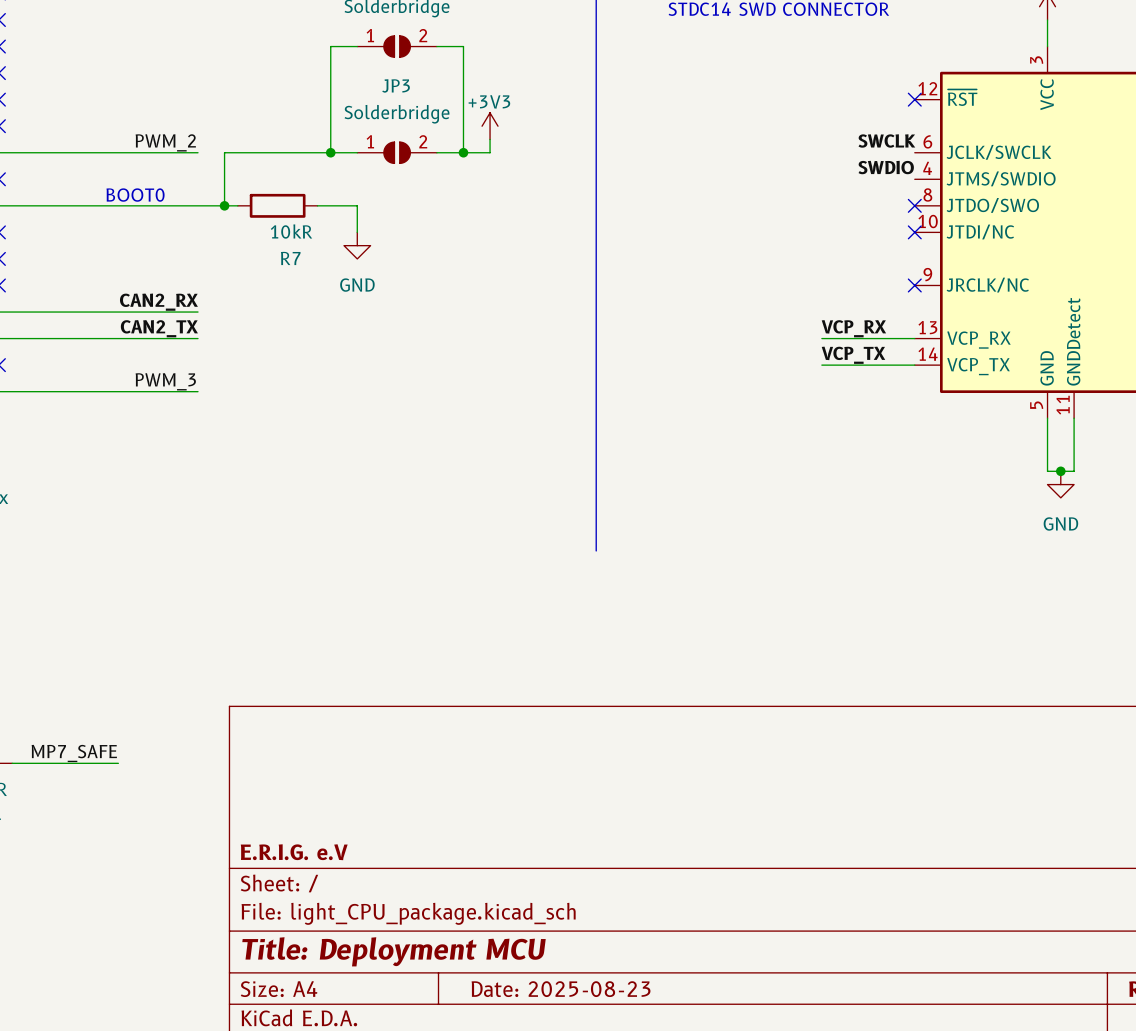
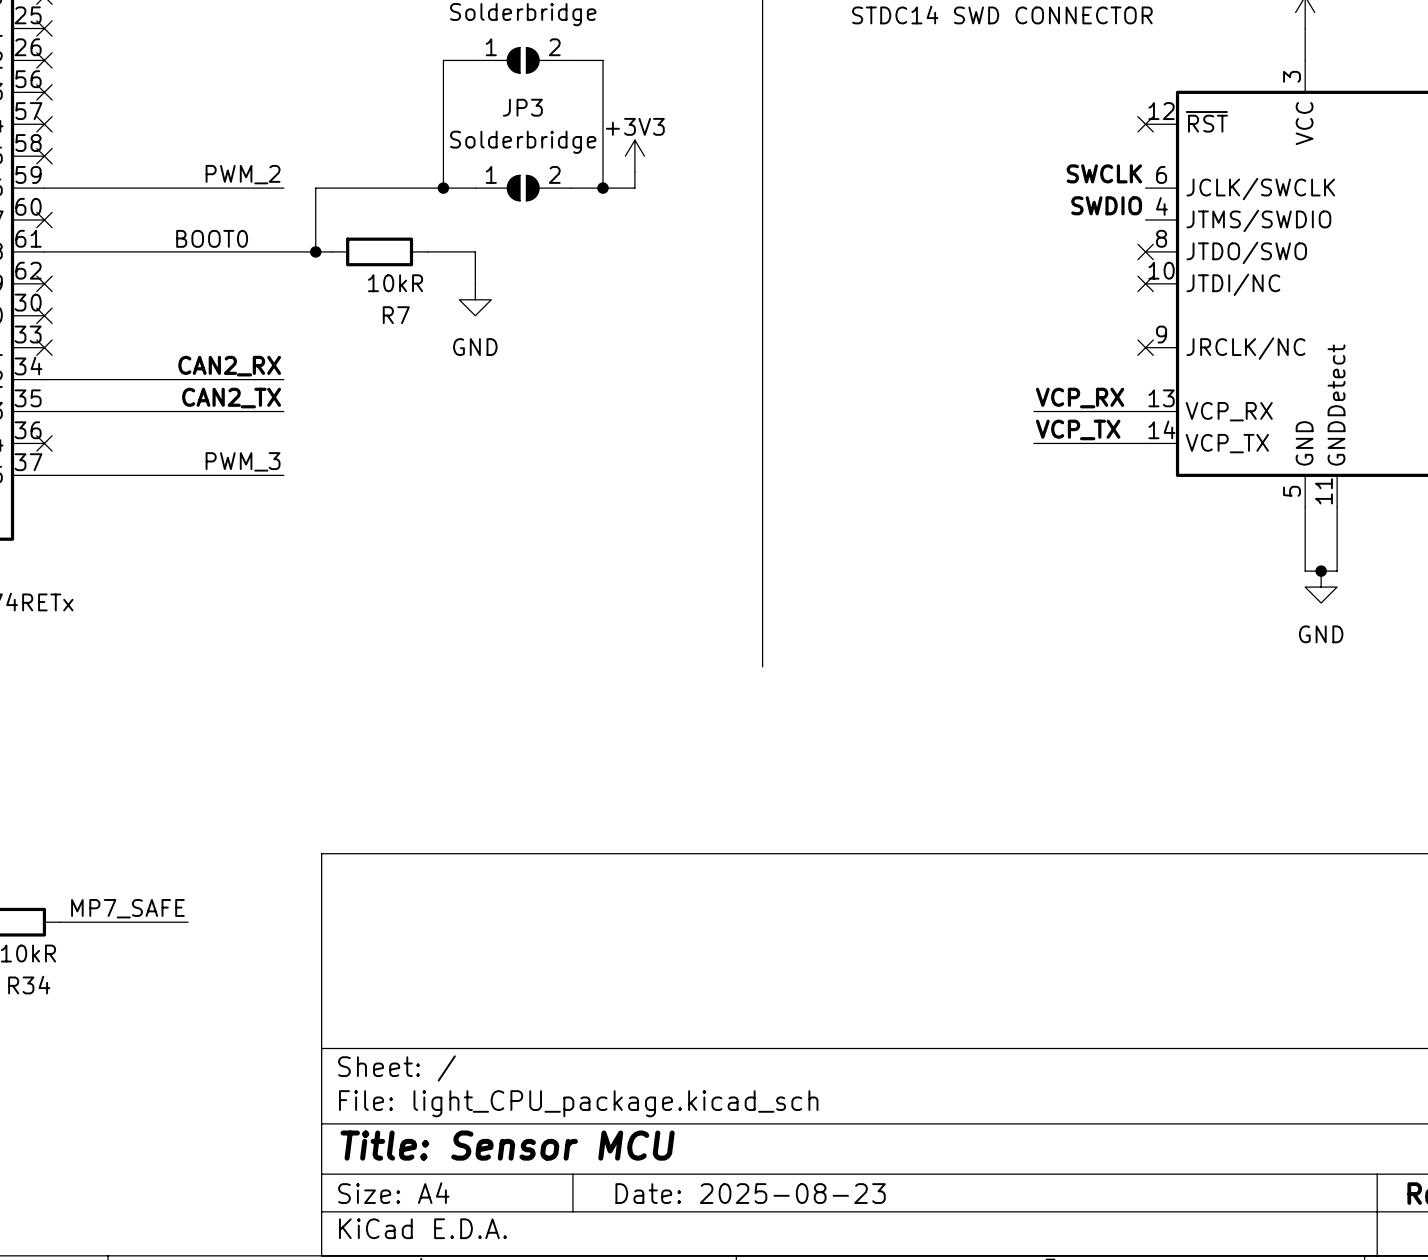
title block: E.R.I.G. e.V (294, 852) -> none
title block: Title: Deployment MCU (394, 951) -> Title: Sensor MCU (507, 1145)

